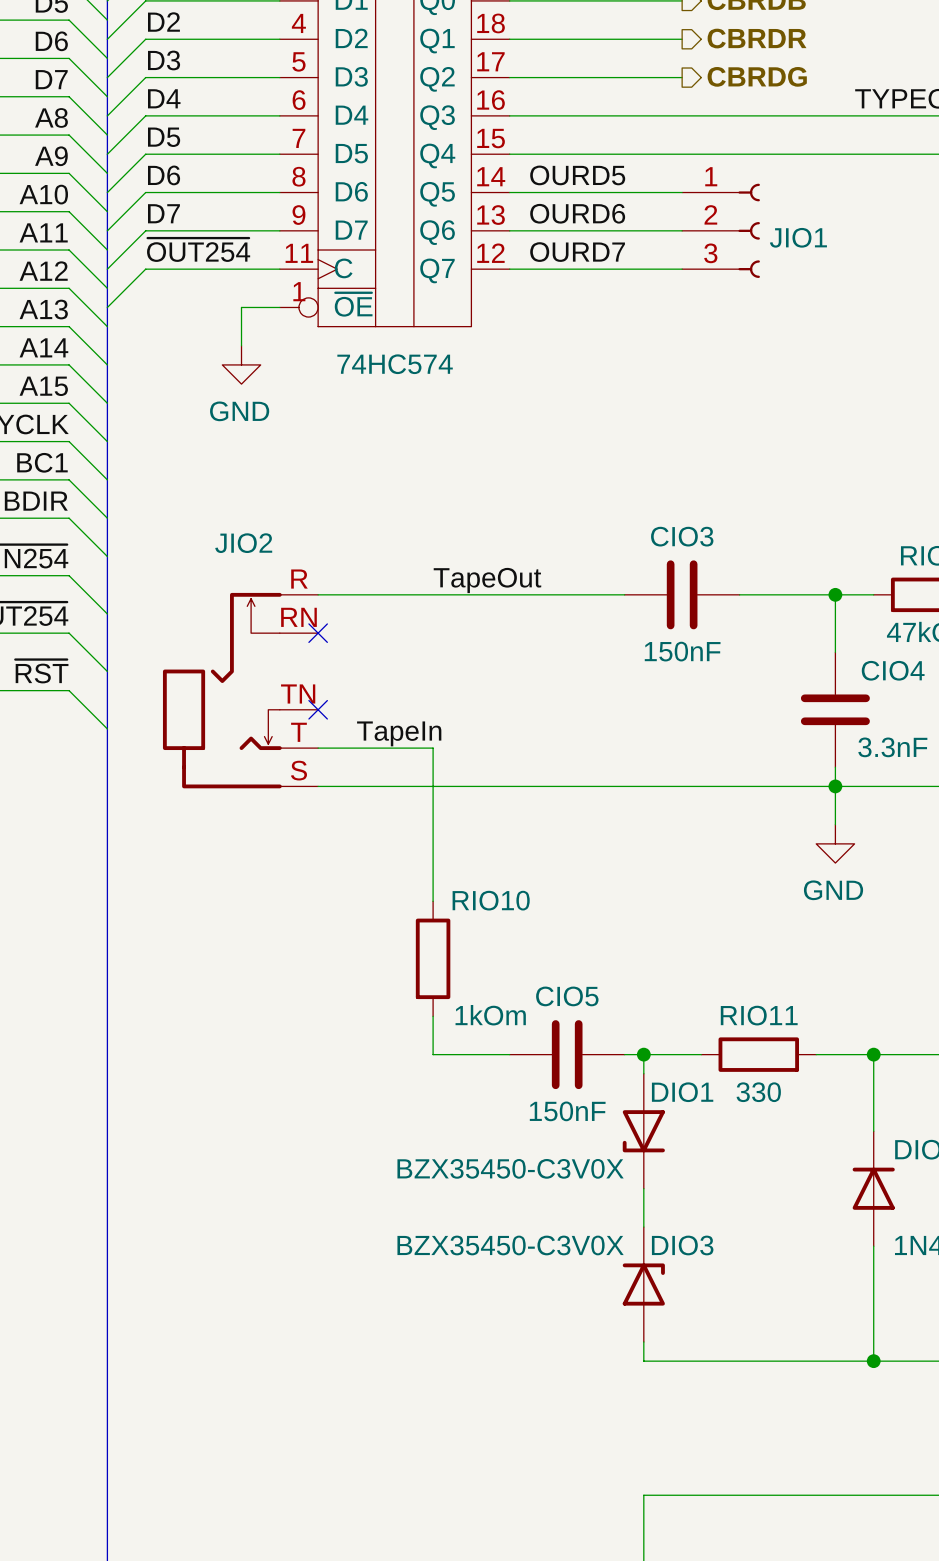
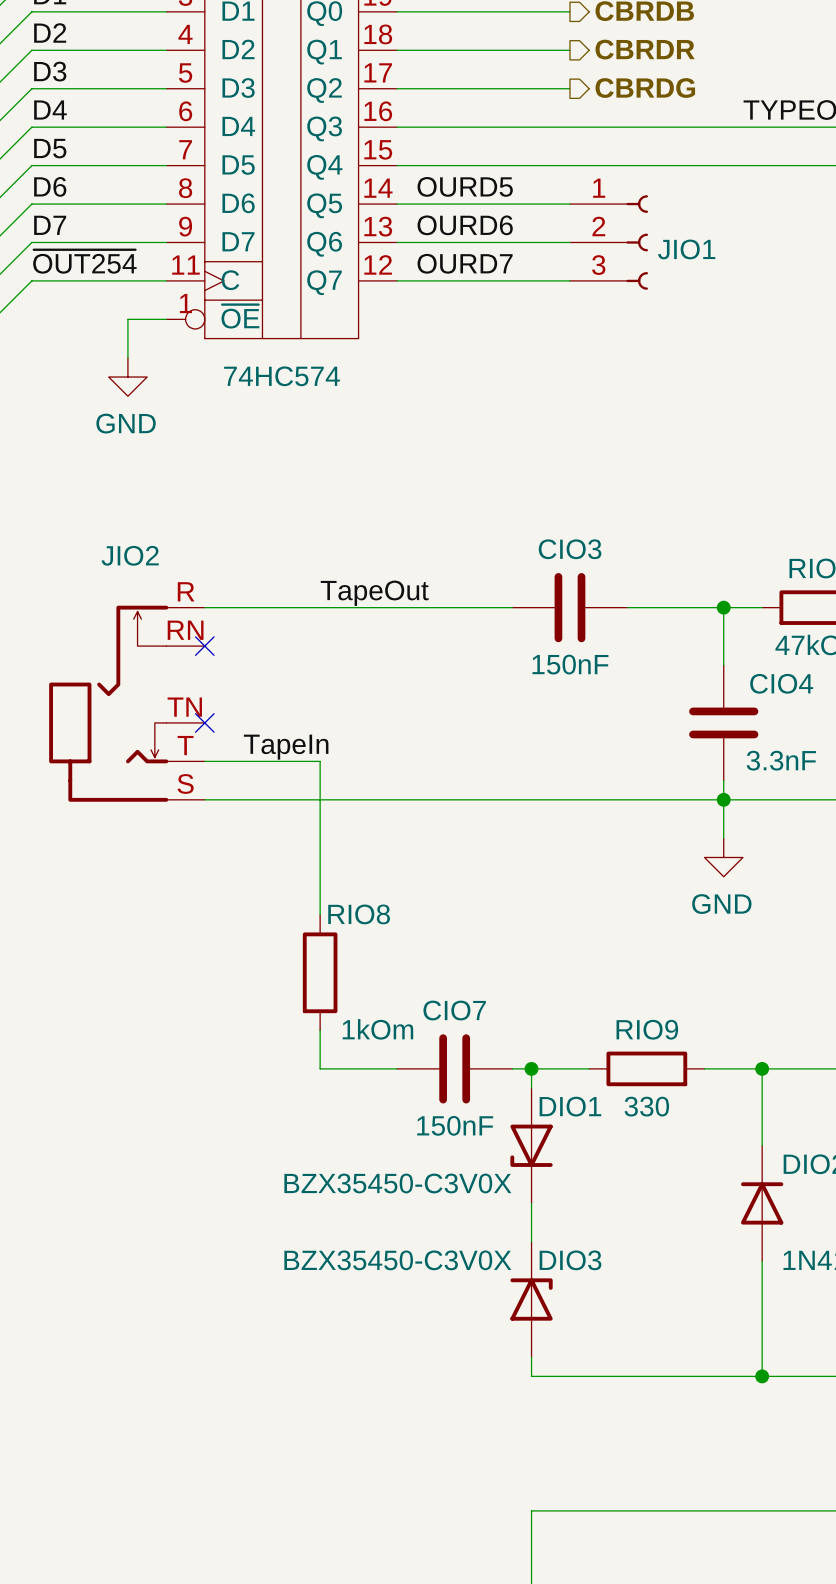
RIO10 name: RIO10 (491, 900) -> RIO8 (359, 914)
CIO5 name: CIO5 (567, 996) -> CIO7 (454, 1010)
RIO11 name: RIO11 (759, 1015) -> RIO9 (647, 1029)

